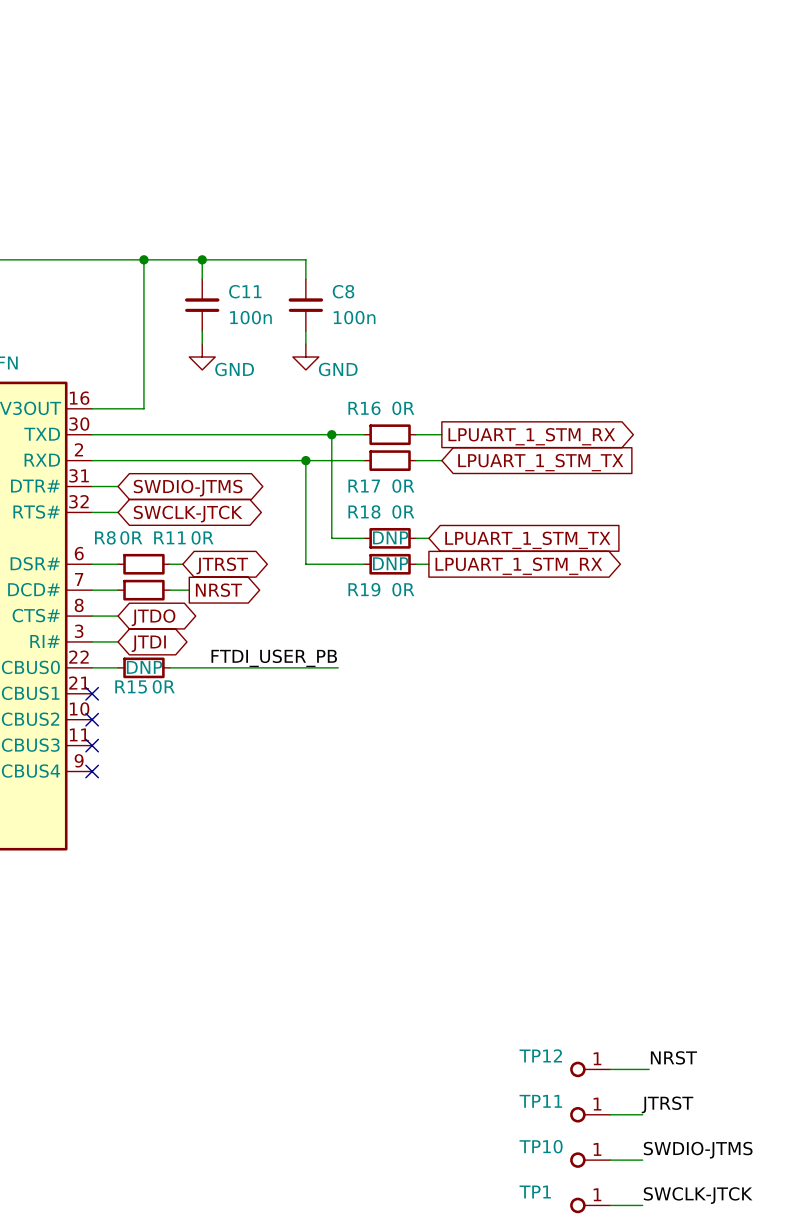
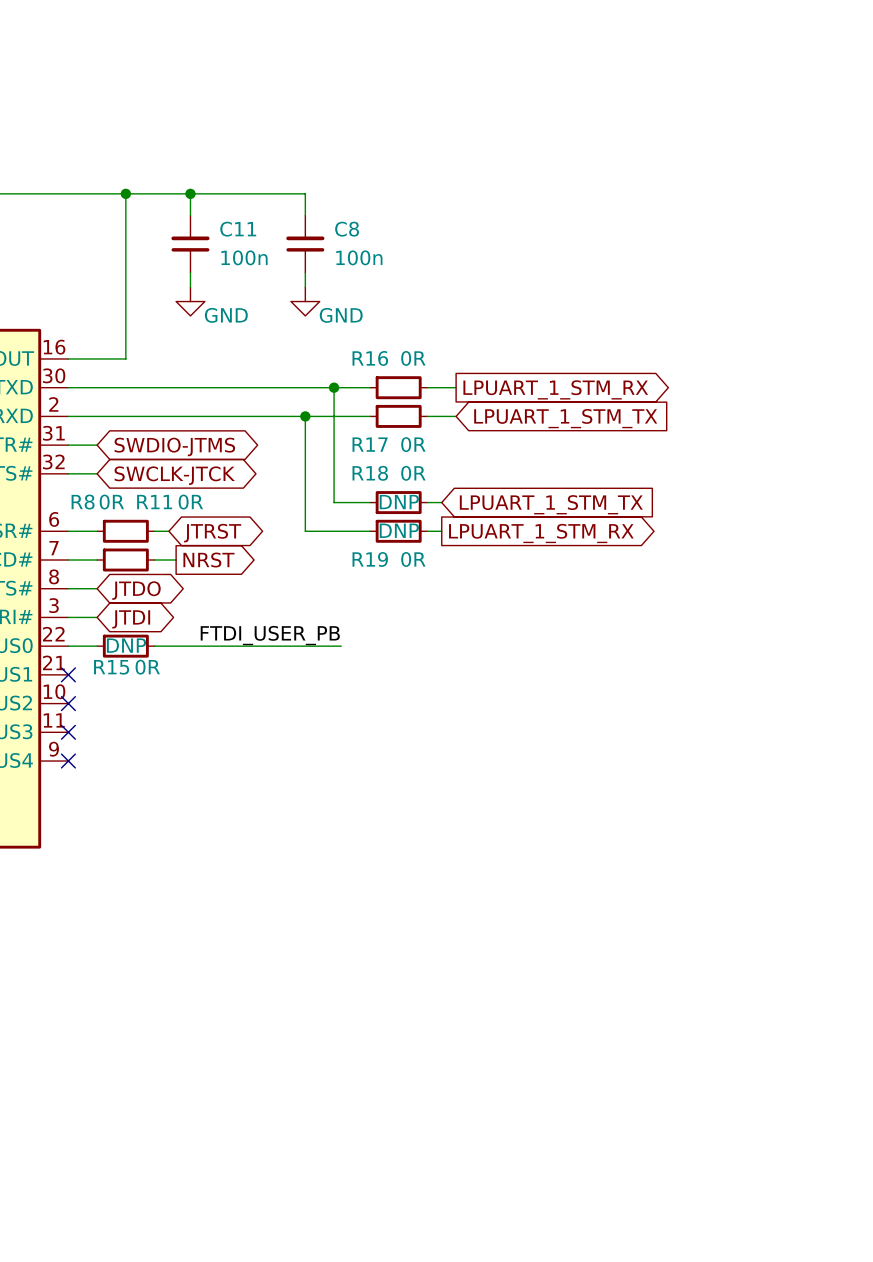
label: NRST (673, 1057) -> none
TP12: (590, 1069) -> none
wire: (610, 1069) (649, 1069) -> none
label: JTRST (667, 1104) -> none
TP11: (590, 1114) -> none
wire: (610, 1114) (642, 1114) -> none
label: SWDIO-JTMS (698, 1150) -> none
TP10: (590, 1160) -> none
wire: (610, 1160) (642, 1160) -> none
label: SWCLK-JTCK (698, 1195) -> none
TP1: (590, 1205) -> none
wire: (610, 1205) (642, 1205) -> none

